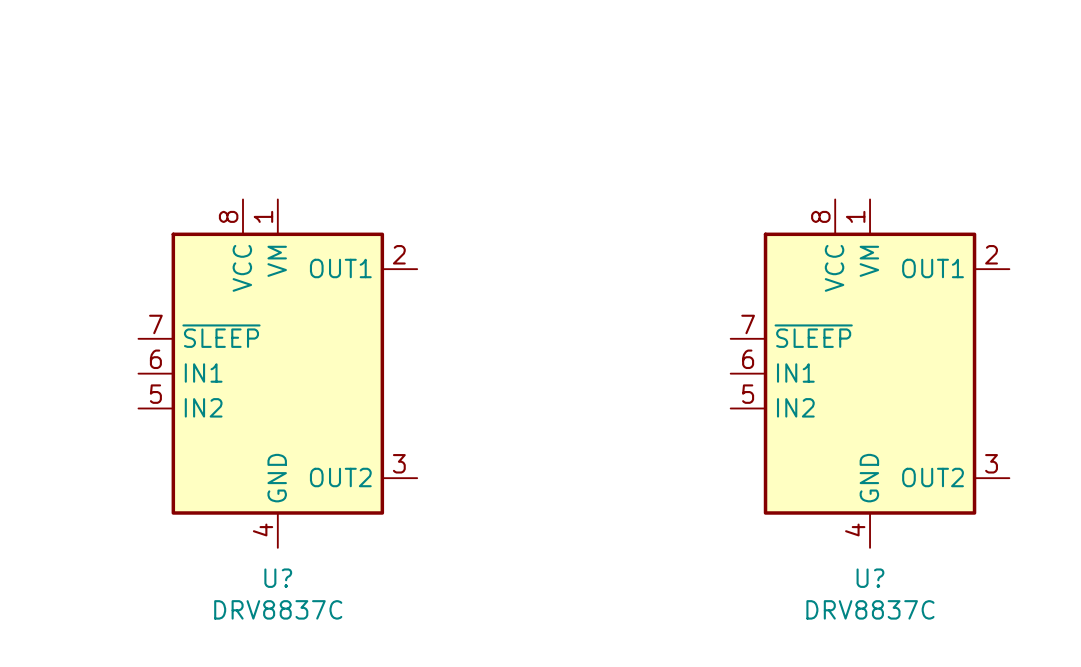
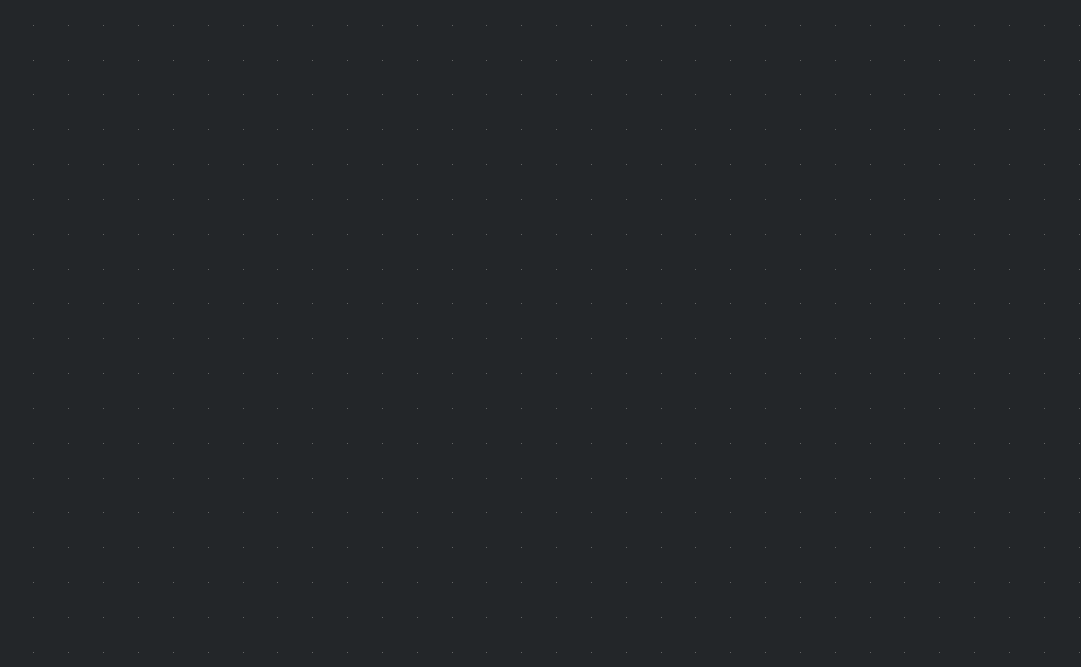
U?: DRV8837C (277, 373) -> none
U?: DRV8837C (870, 373) -> none

